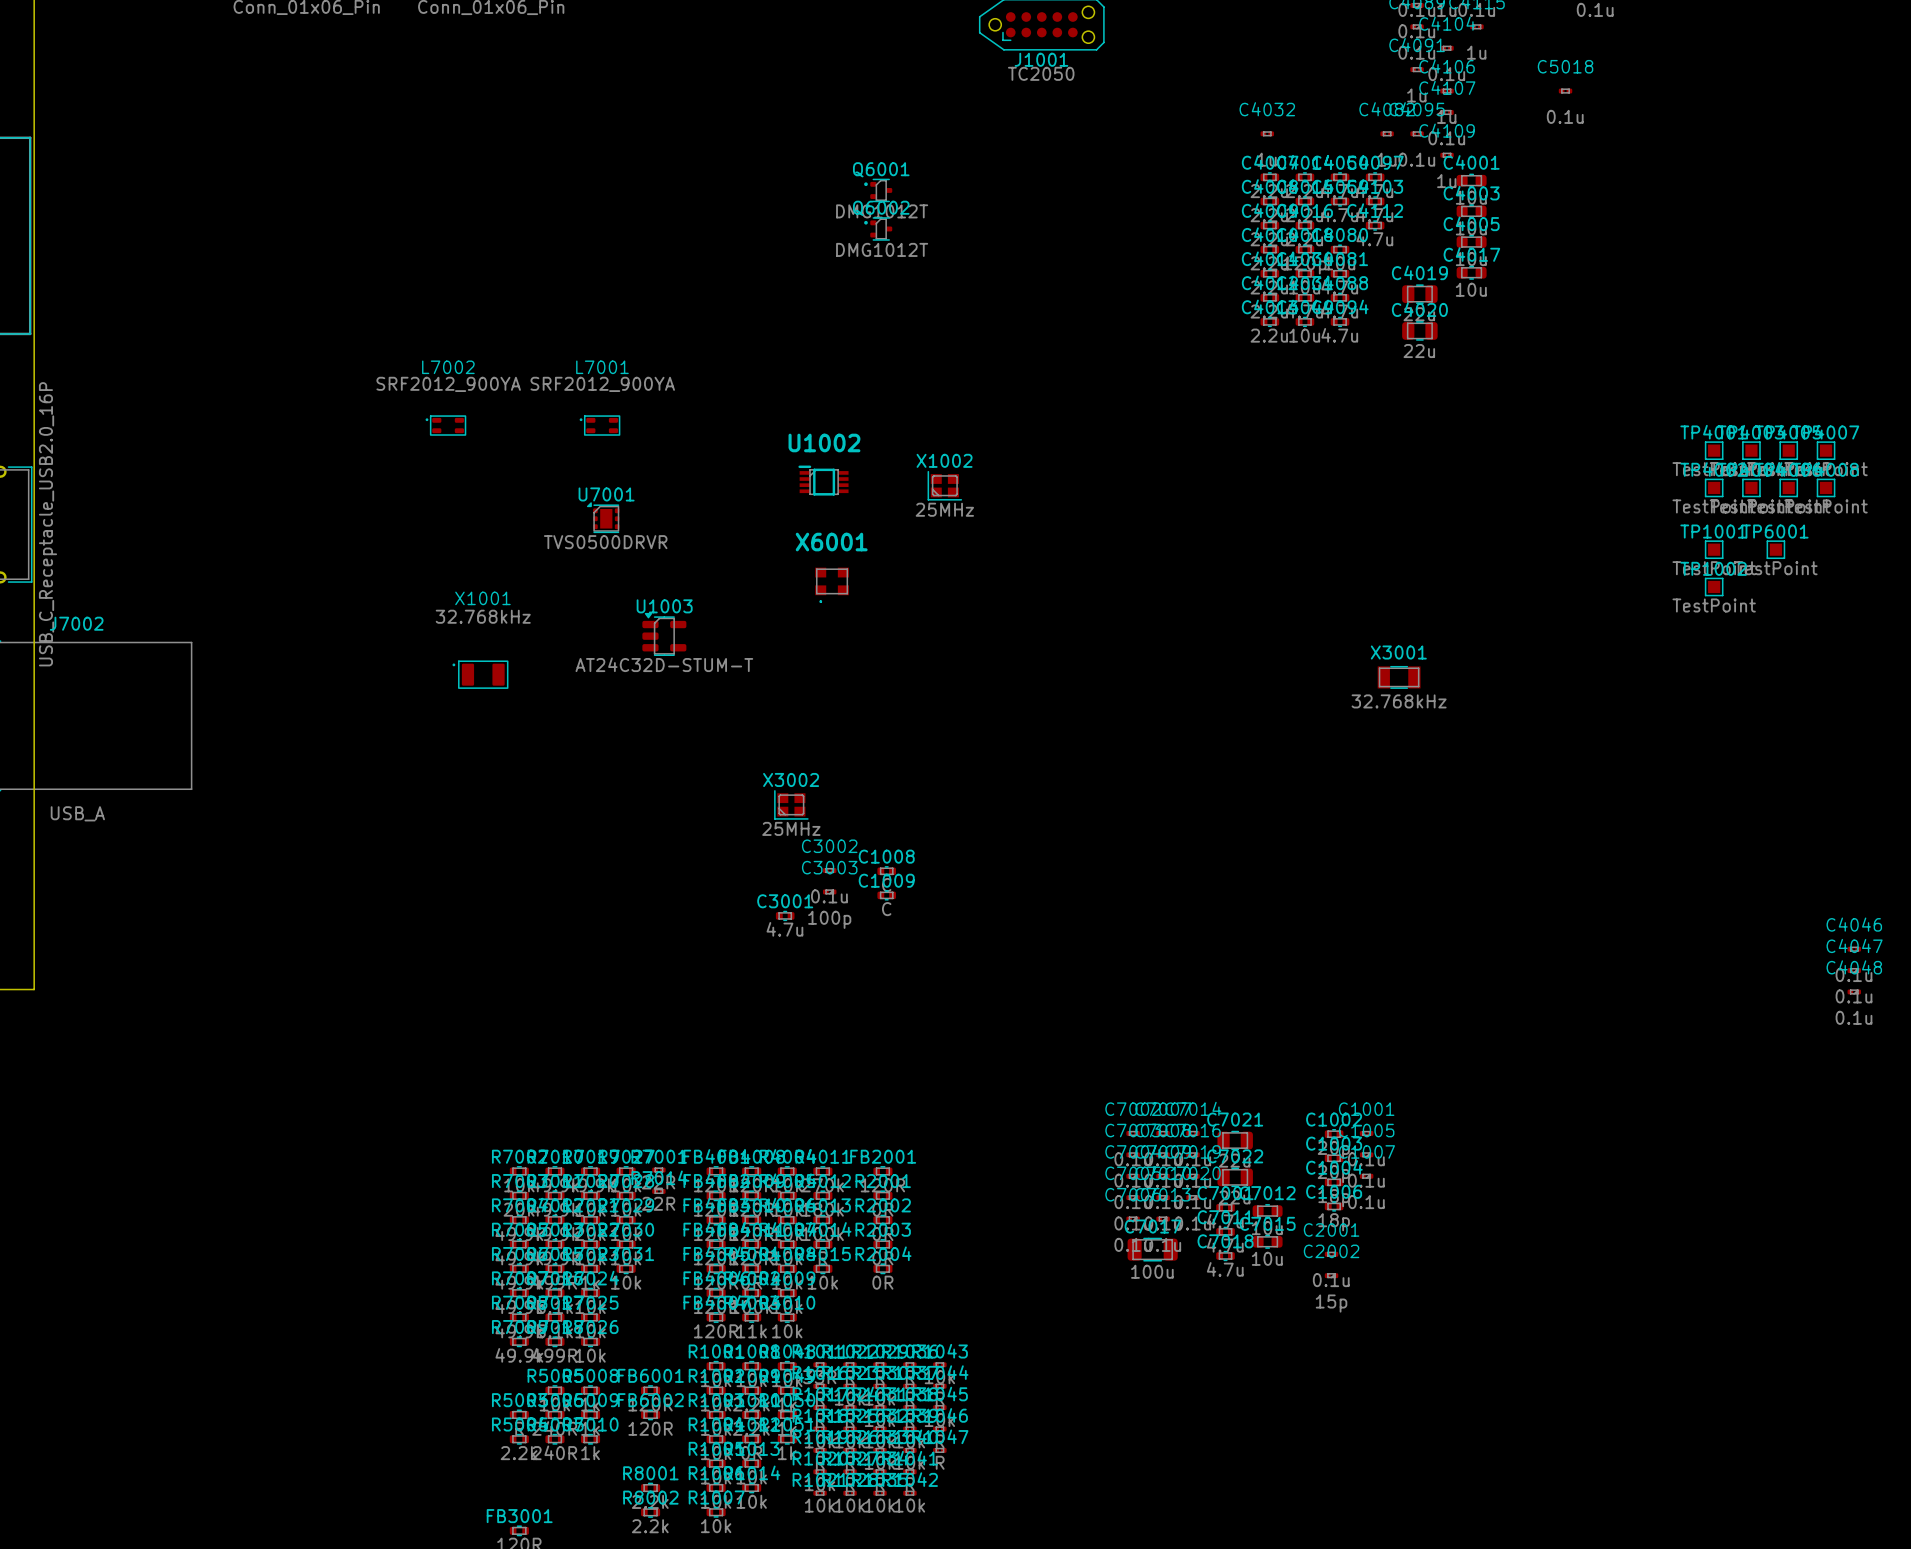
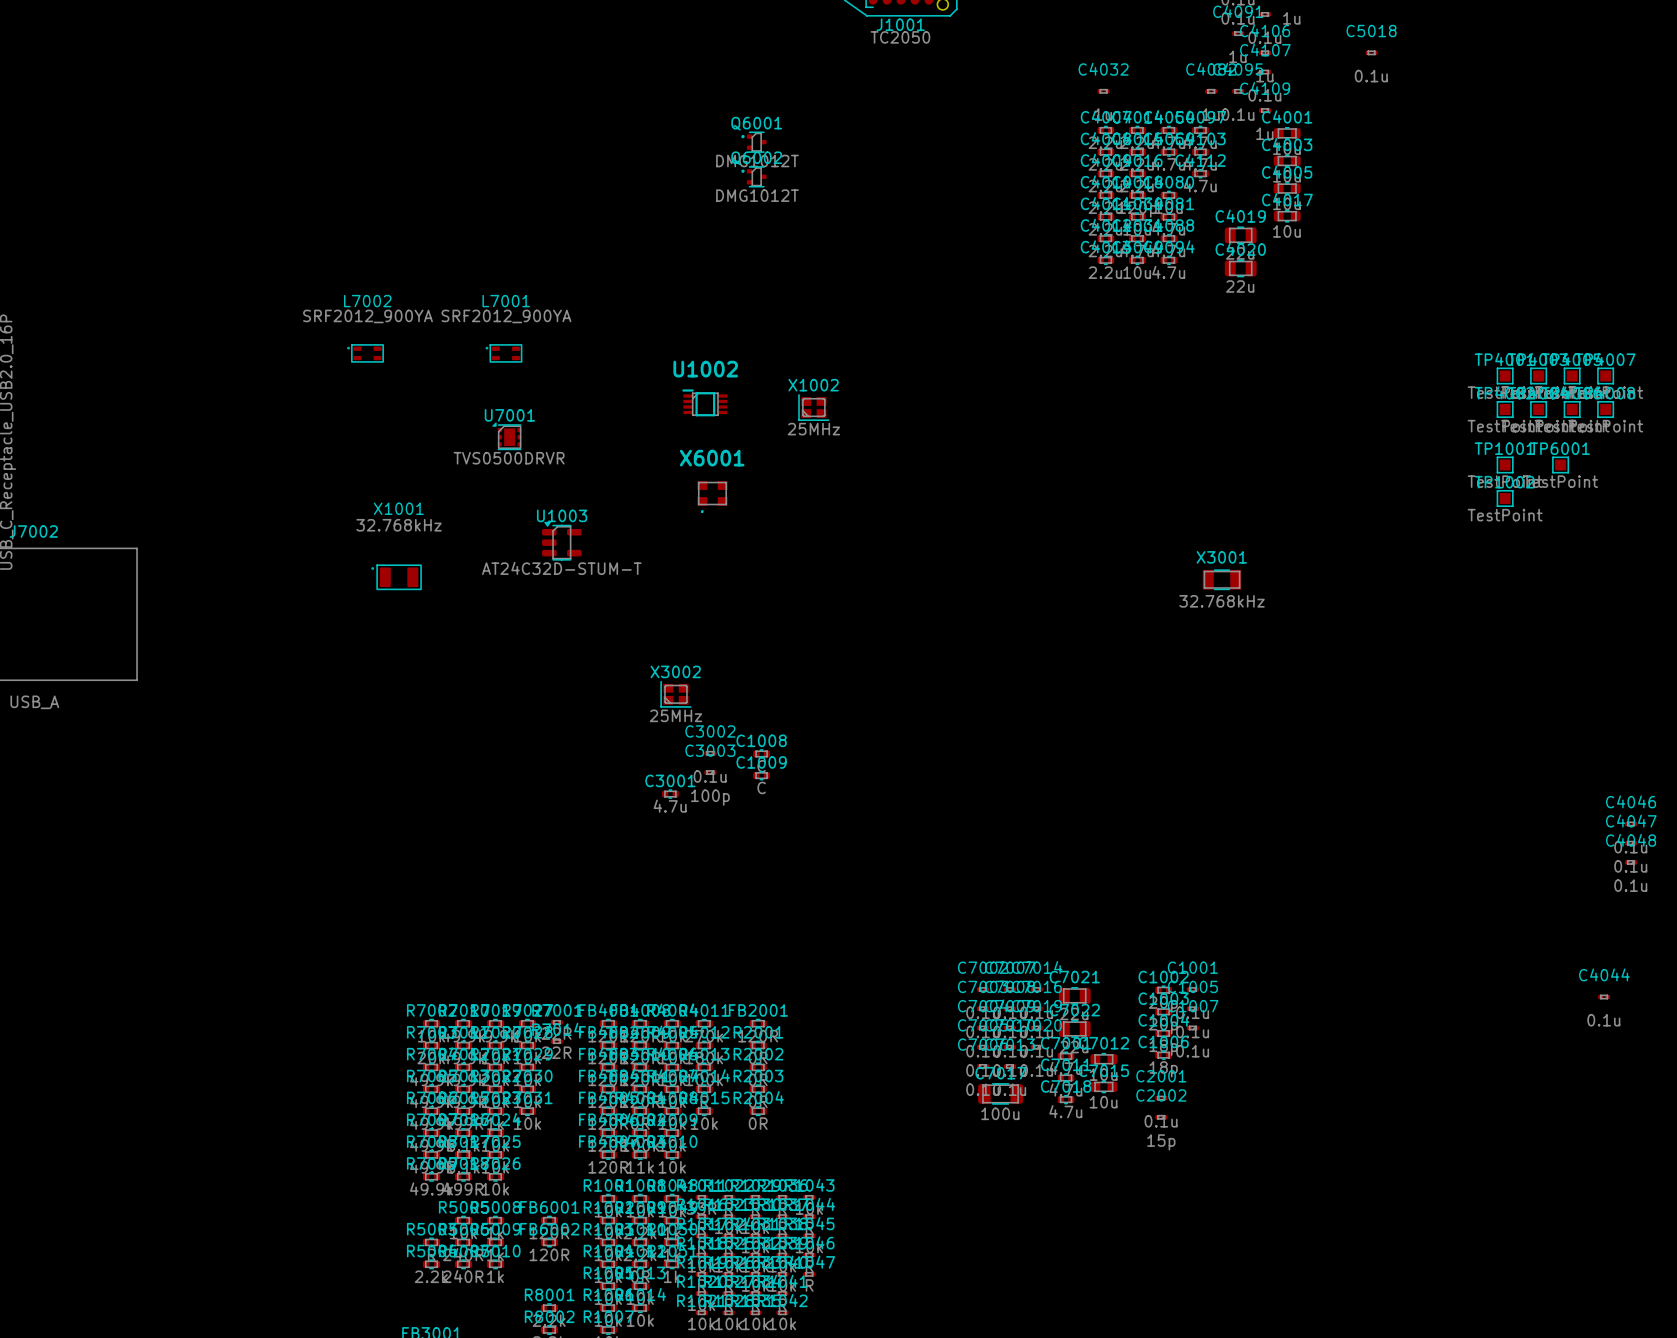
C4044: none -> 0.1u (1604, 997)

